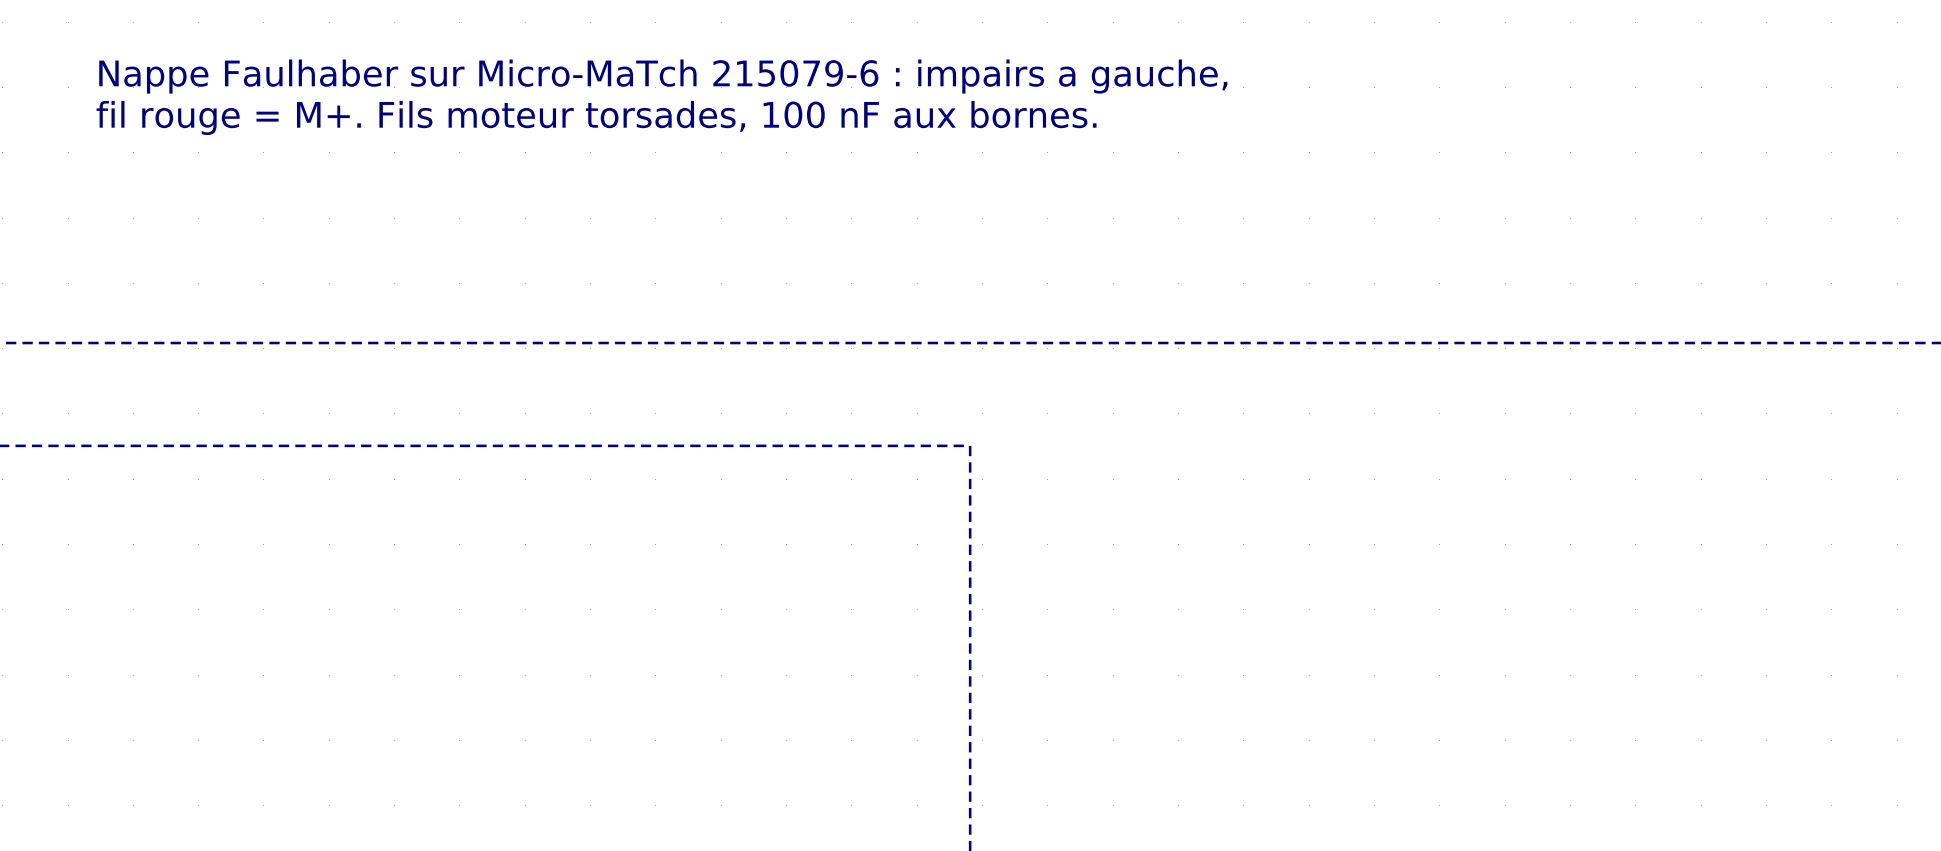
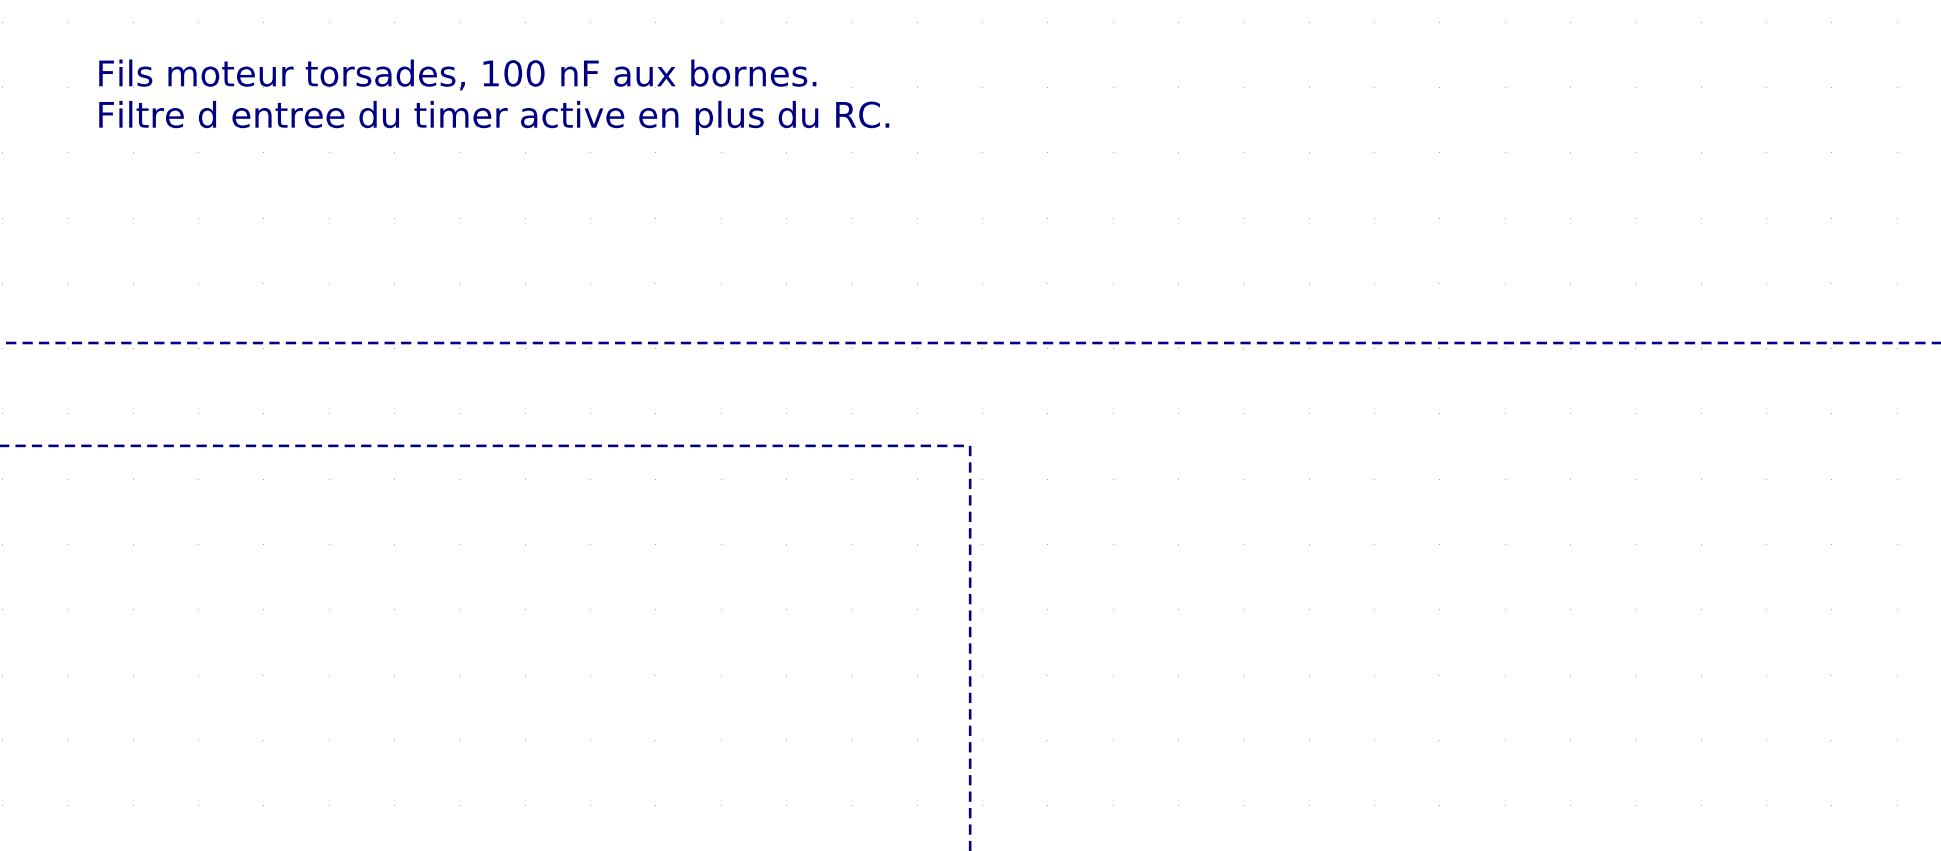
text: Nappe Faulhaber sur Micro-MaTch 215079-6 : impairs a gauche, (663, 76) -> Fils moteur torsades, 100 nF aux bornes. (457, 74)
text: fil rouge = M+. Fils moteur torsades, 100 nF aux bornes. (596, 117) -> Filtre d entree du timer active en plus du RC. (494, 117)

